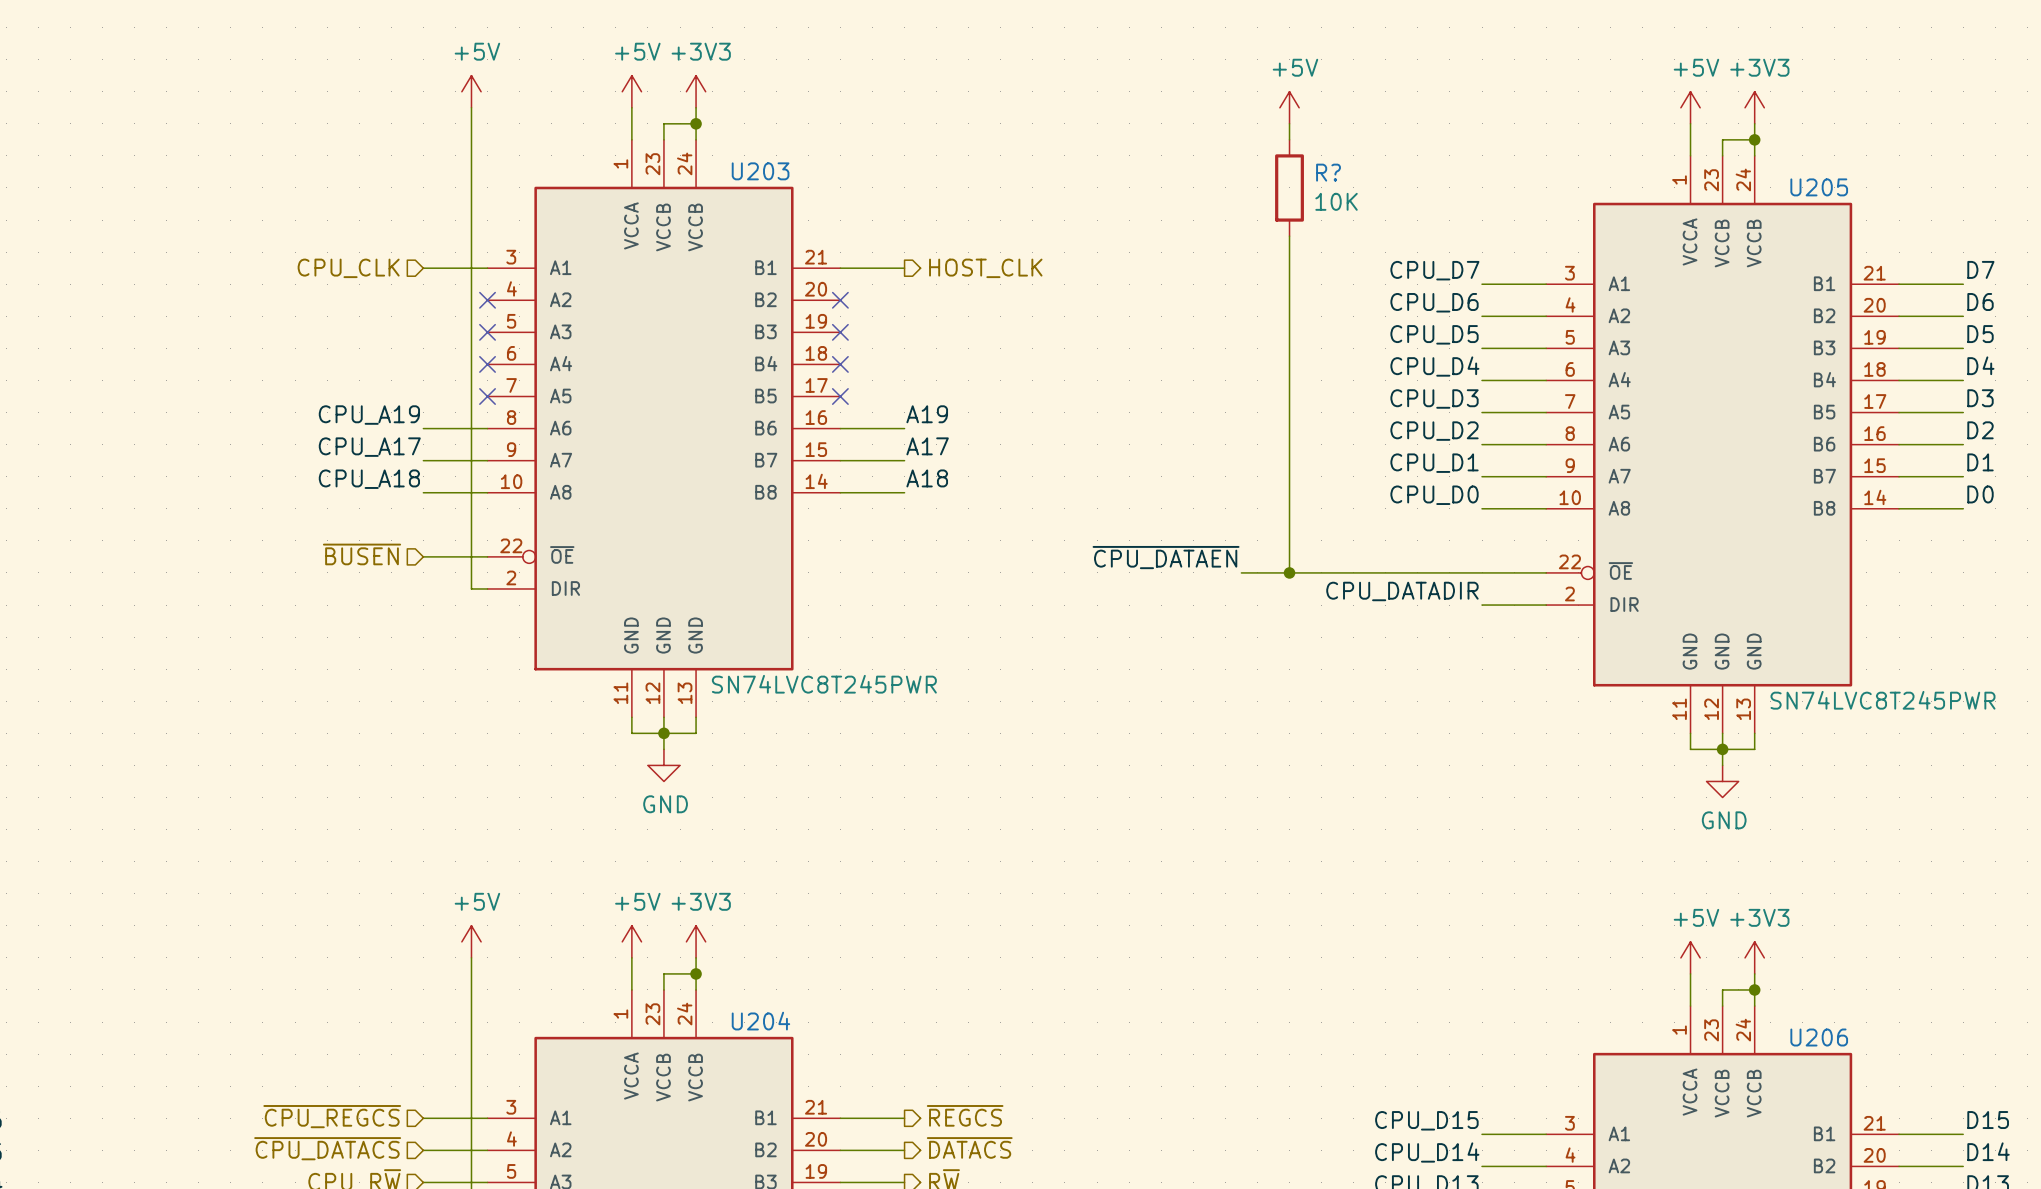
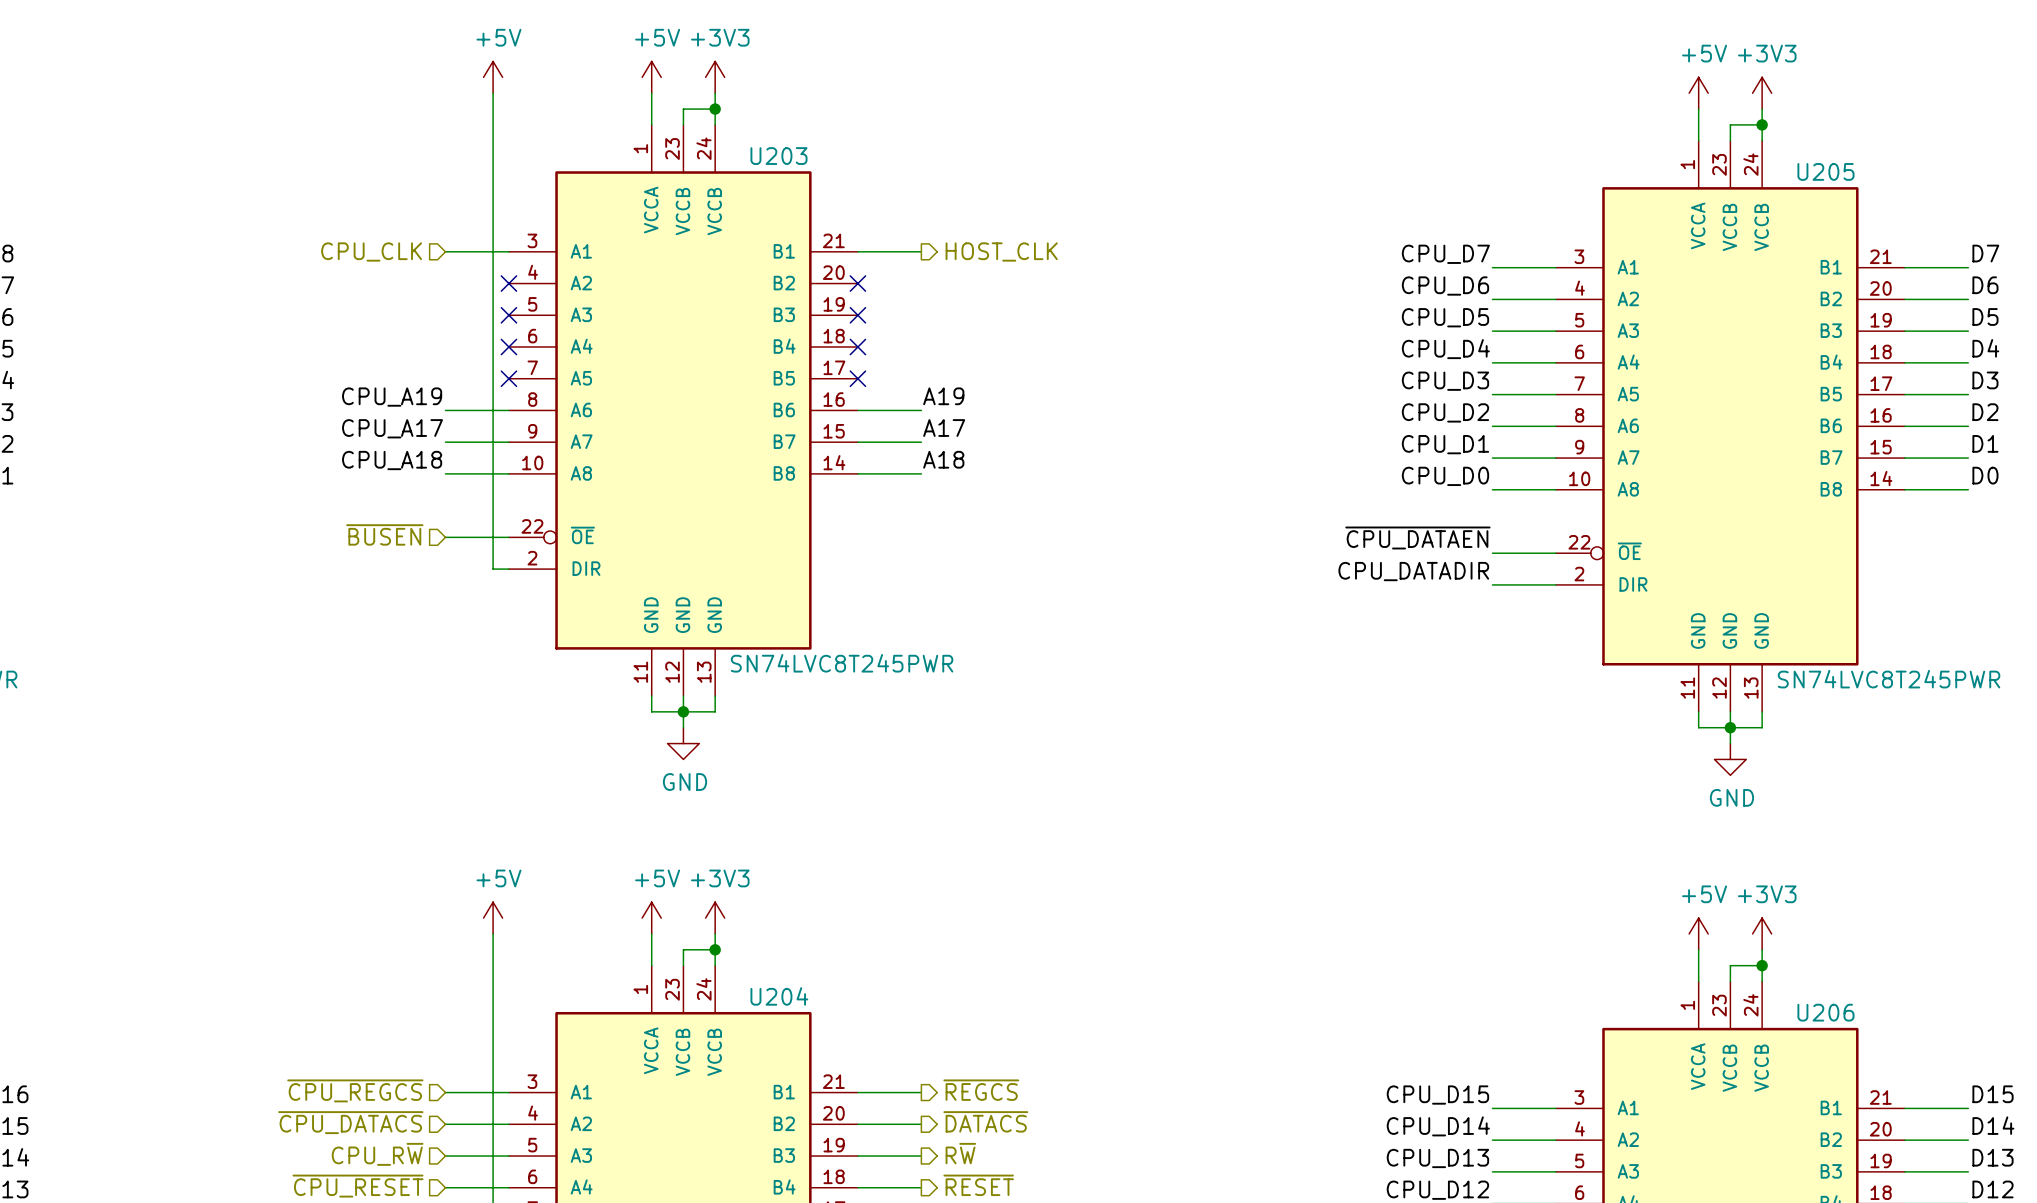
power symbol: +5V (1289, 107) -> none
wire: (1289, 123) (1289, 139) -> none
R?: 10K (1289, 187) -> none
wire: (1289, 236) (1289, 572) -> none
label position: ~{CPU_DATAEN} (1166, 557) -> ~{CPU_DATAEN} (1417, 538)
wire: (1241, 572) (1482, 572) -> none
junction: (1289, 572) -> none

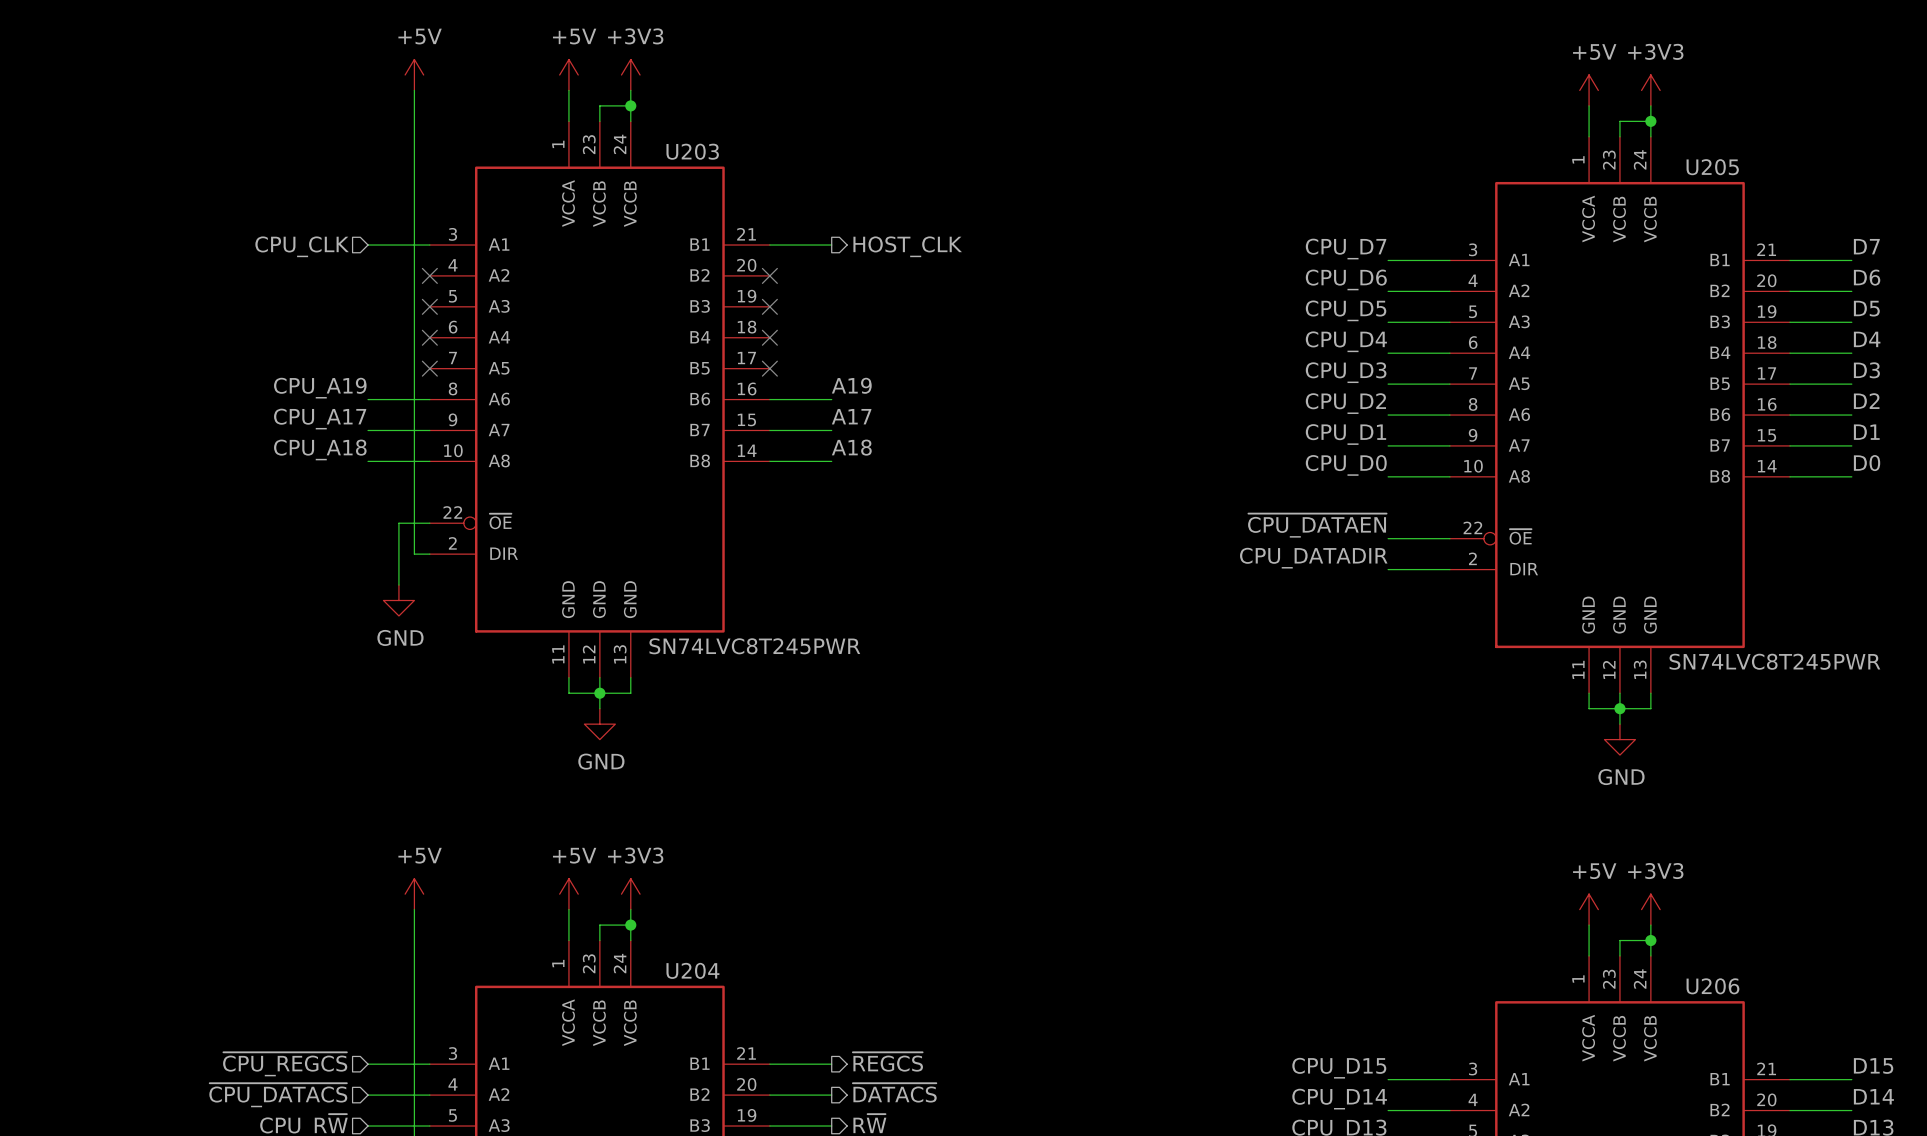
hierarchical label: ~{BUSEN} (384, 534) -> none
wire: (445, 537) (477, 537) -> (398, 585) (398, 523)
power symbol: none -> GND (398, 600)

